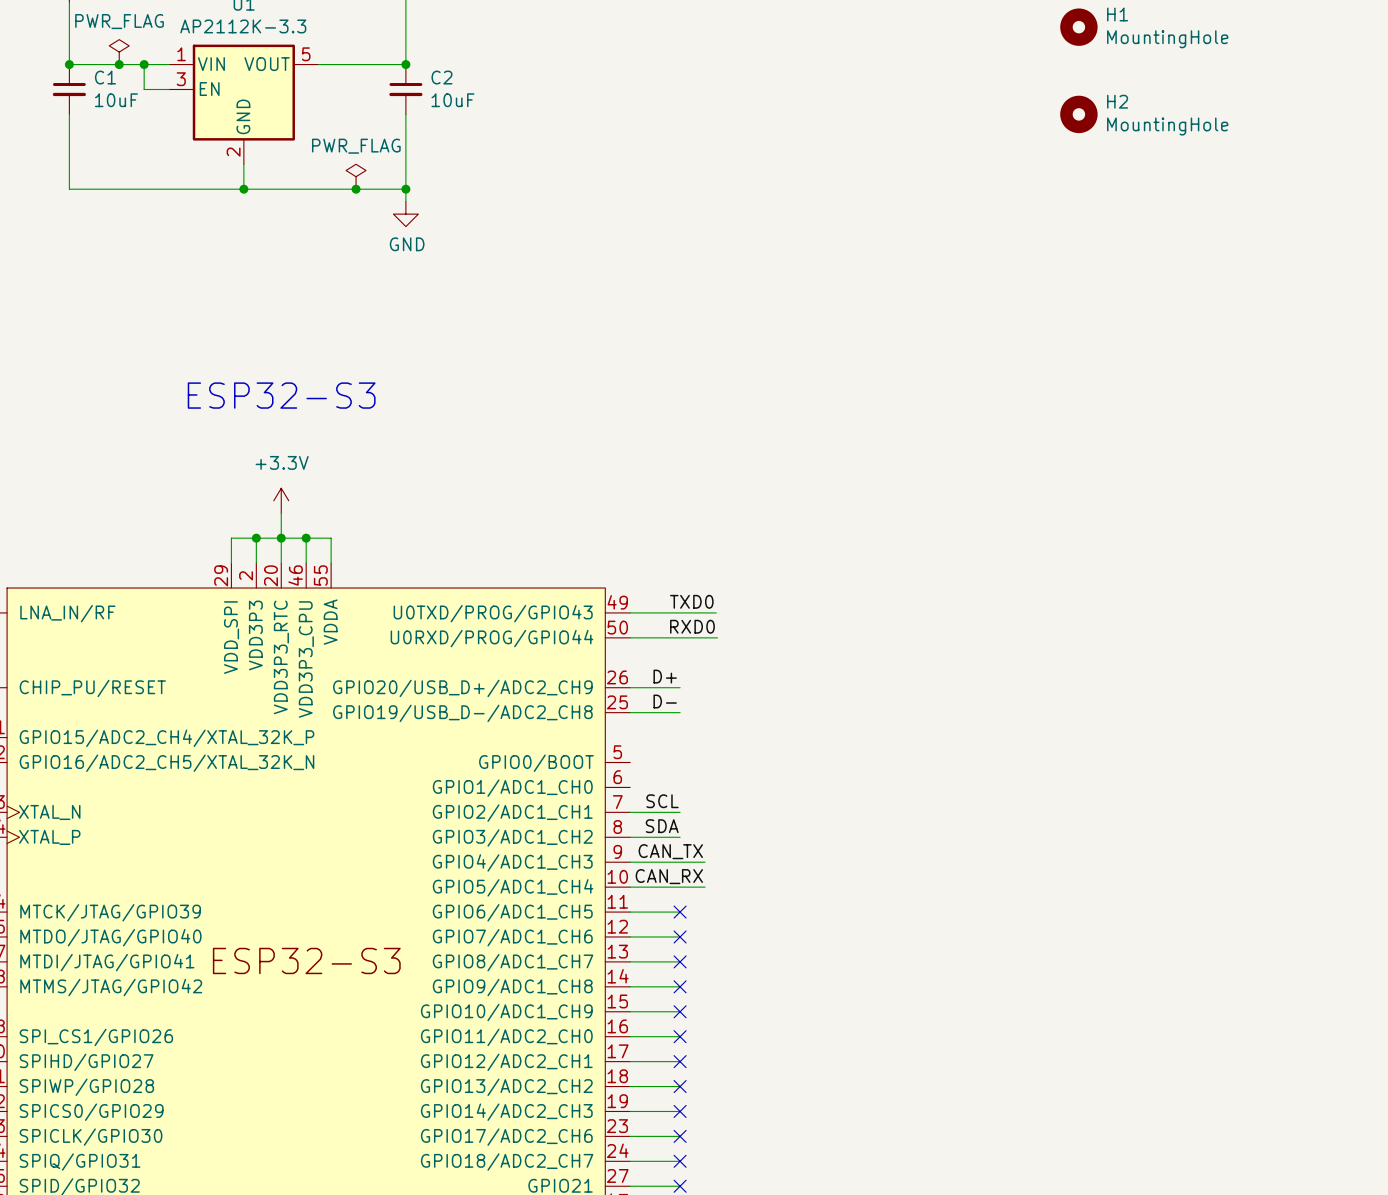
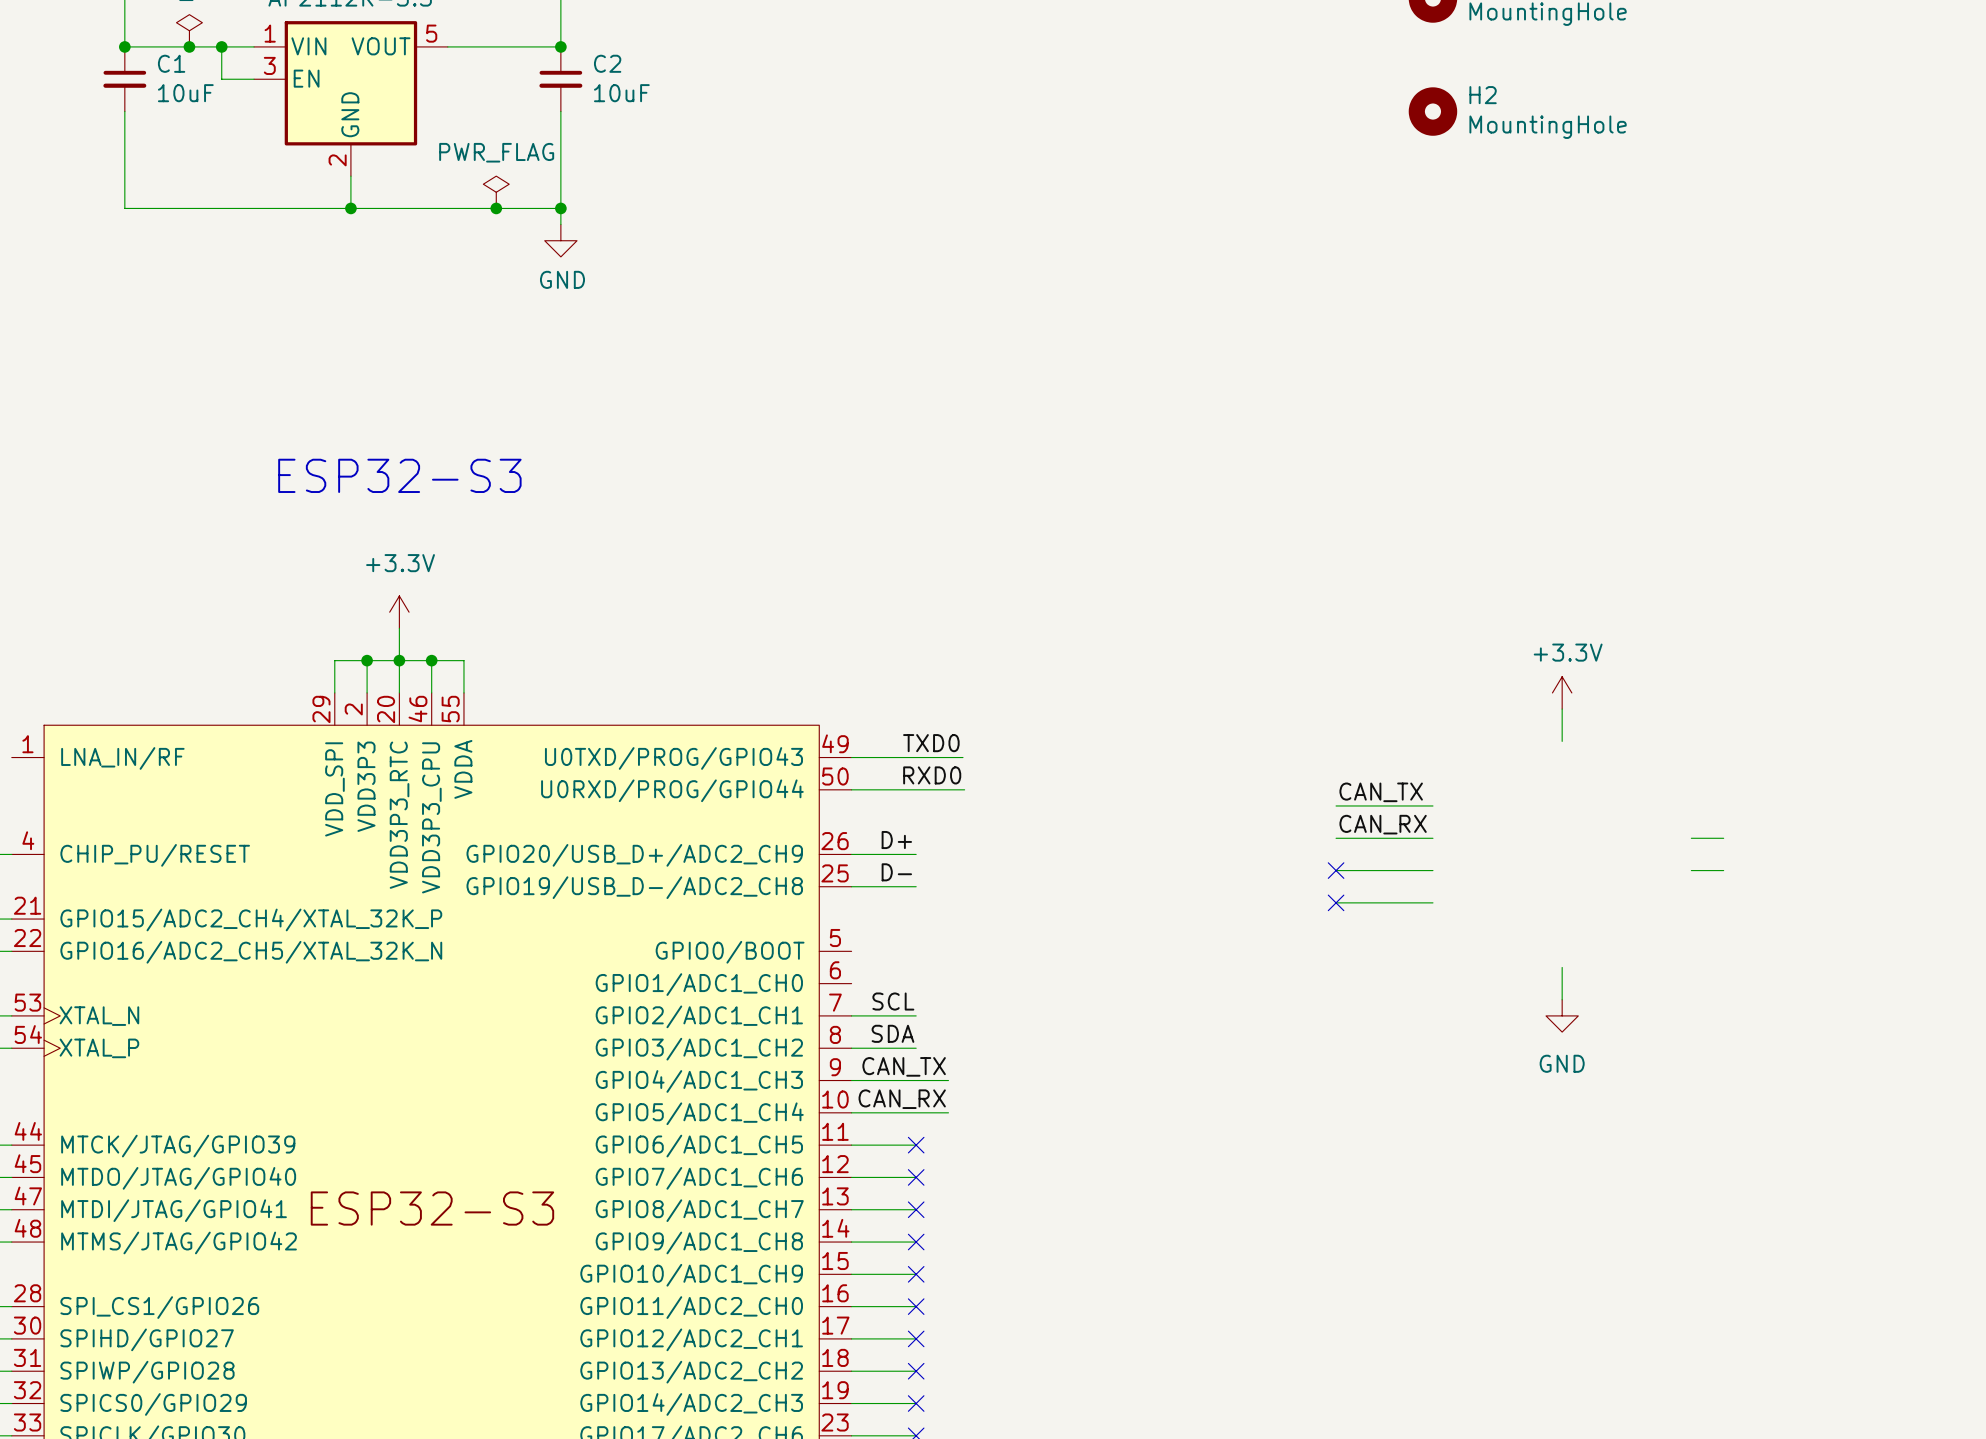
power symbol: none -> +3.3V (1562, 692)
wire: none -> (1562, 709) (1562, 741)
label: none -> CAN_TX (1381, 792)
wire: none -> (1336, 805) (1432, 805)
label: none -> CAN_RX (1383, 824)
wire: none -> (1336, 838) (1432, 838)
wire: none -> (1691, 838) (1723, 838)
wire: none -> (1336, 870) (1432, 870)
no-connect mark: none -> (1336, 870)
wire: none -> (1691, 870) (1723, 870)
wire: none -> (1336, 902) (1432, 902)
no-connect mark: none -> (1336, 902)
wire: none -> (1562, 967) (1562, 999)
power symbol: none -> GND (1562, 1015)

